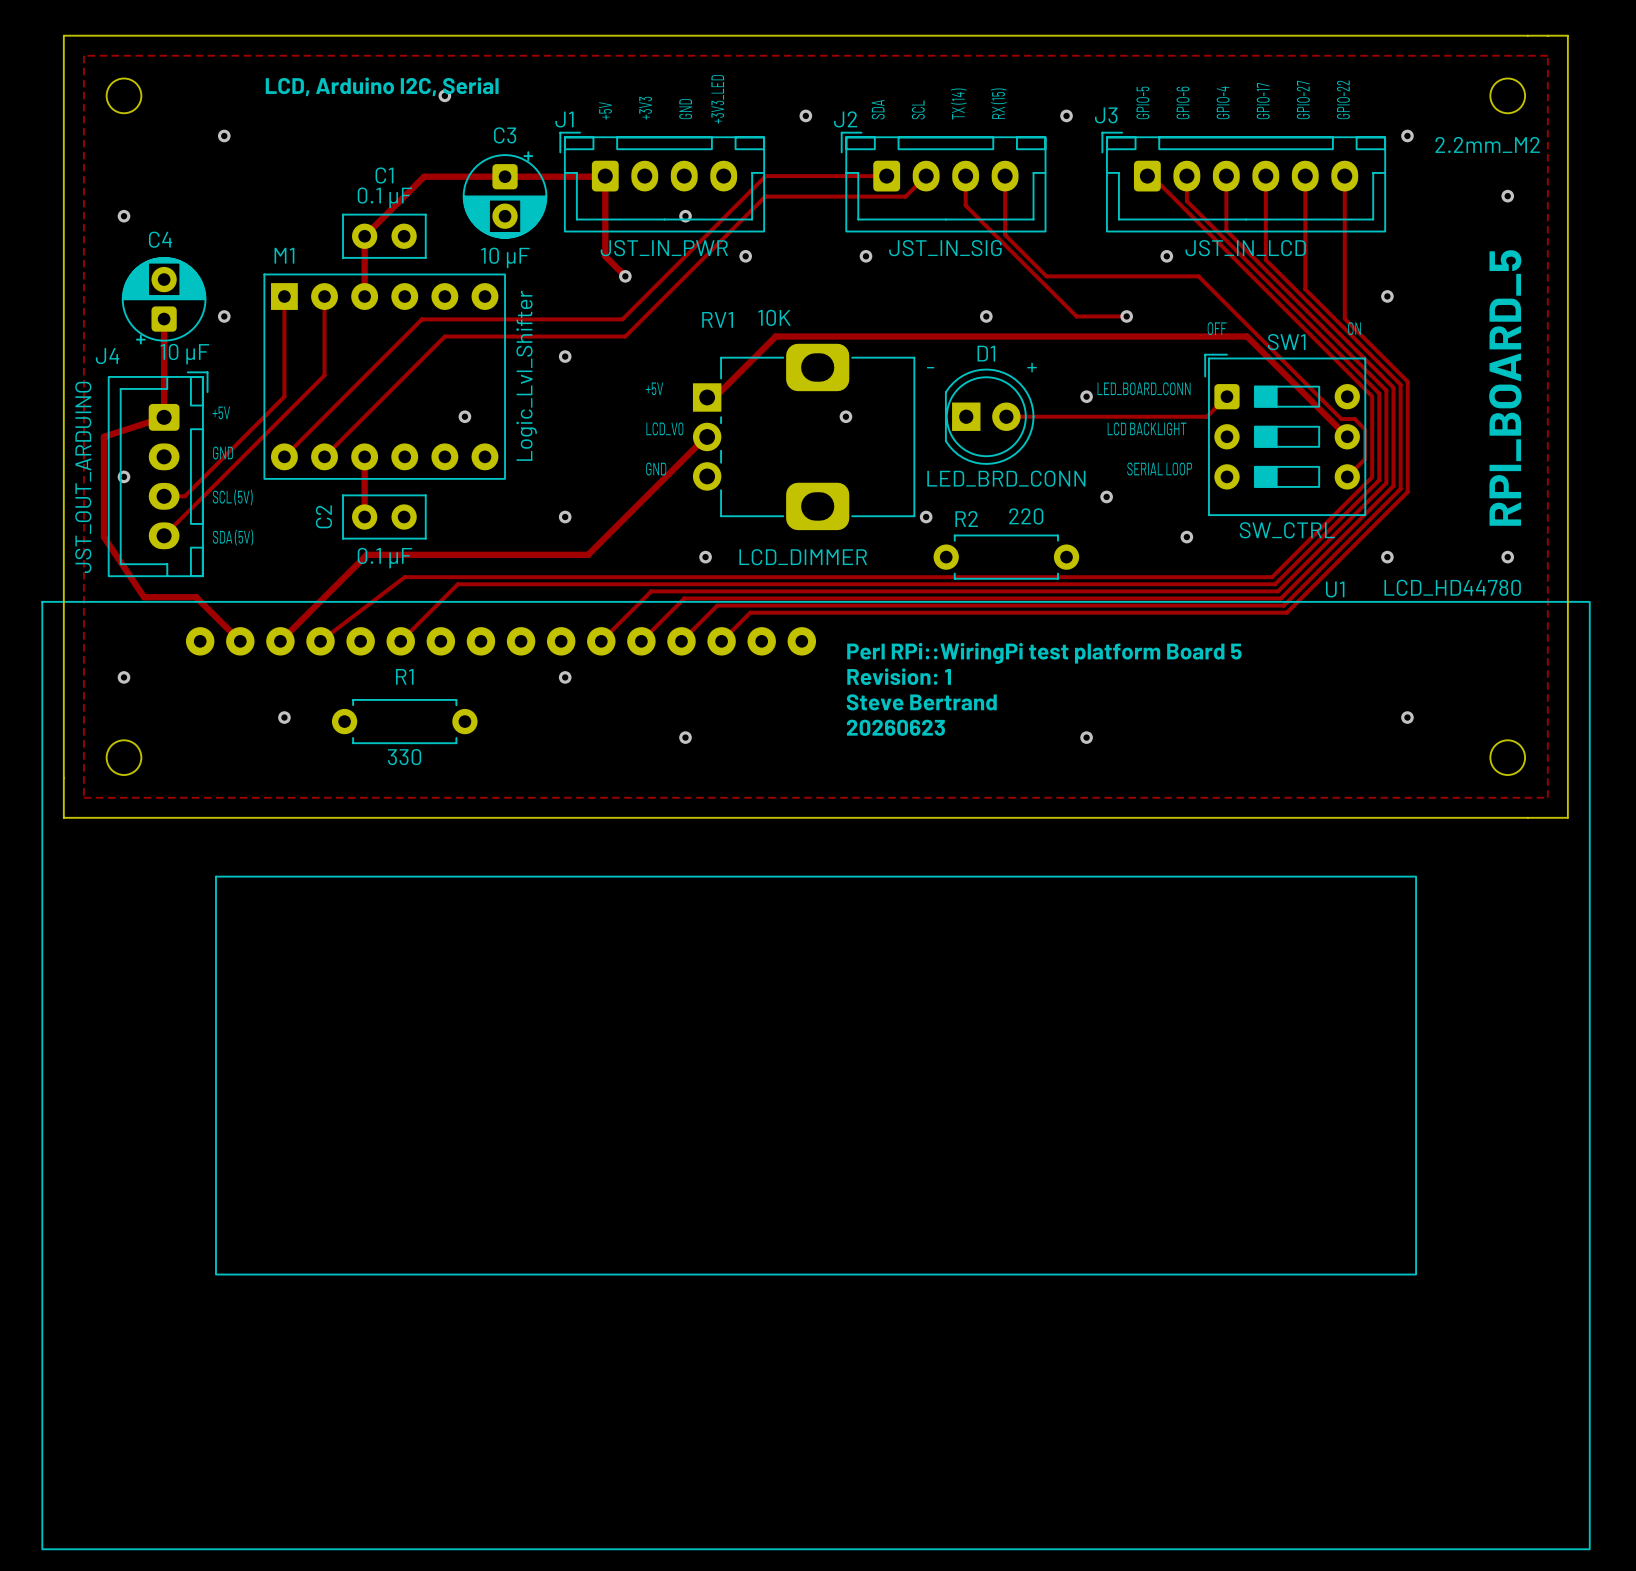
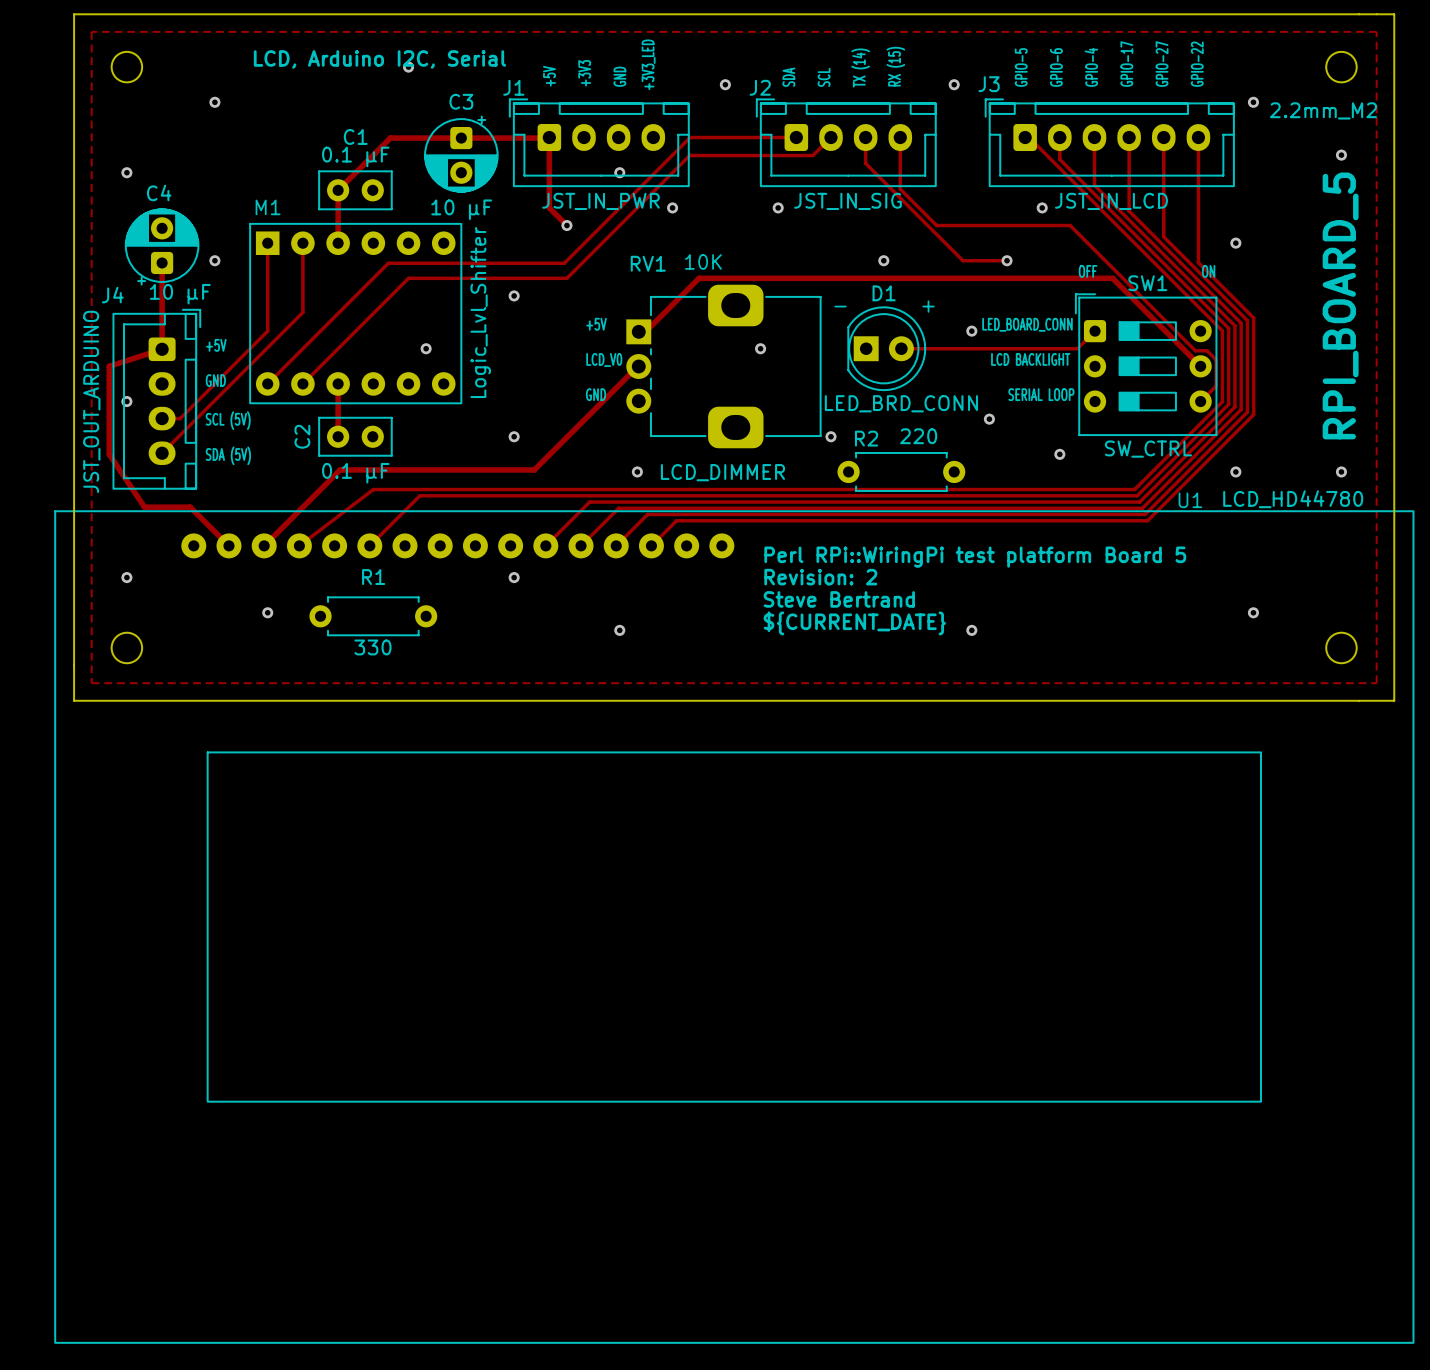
text: Revision: 1 (899, 676) -> Revision: 2 (820, 577)
text: 20260623 (895, 727) -> ${CURRENT_DATE} (854, 623)

